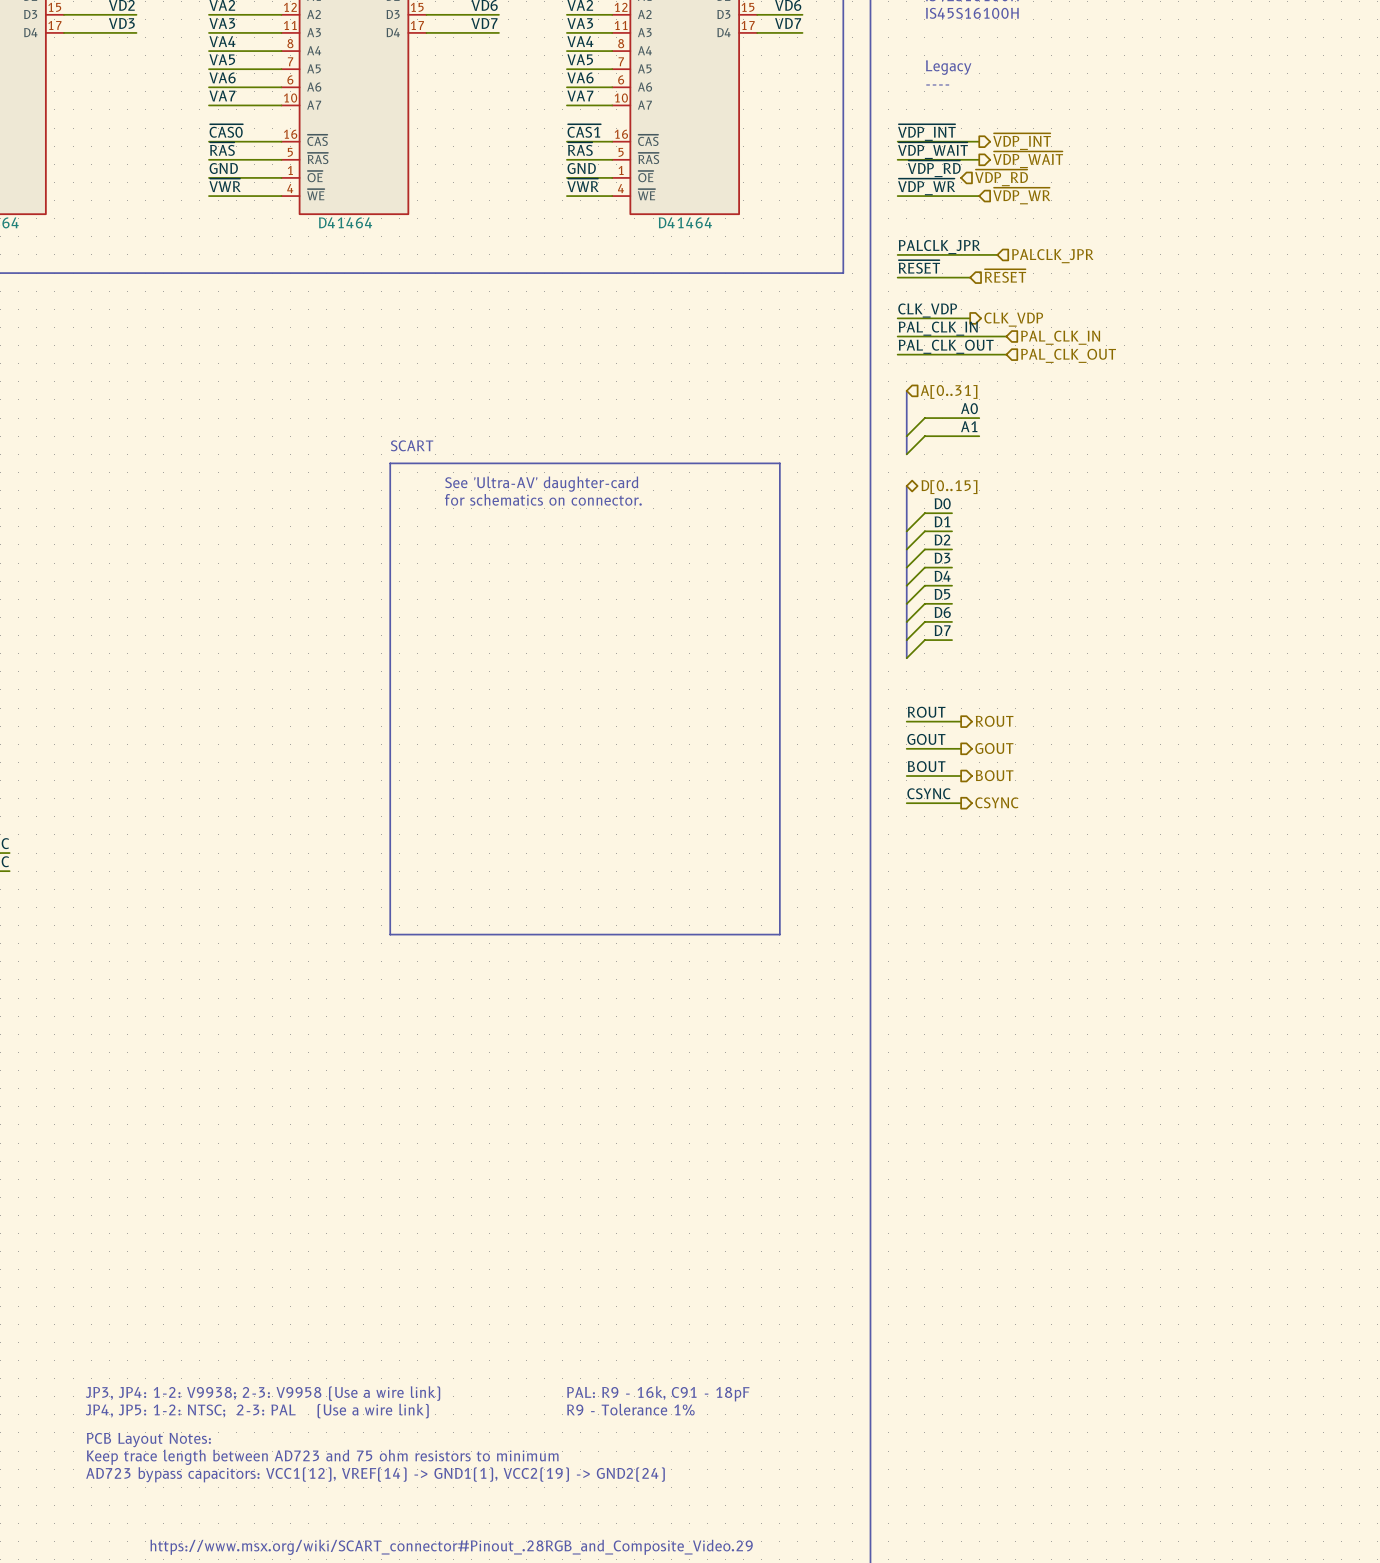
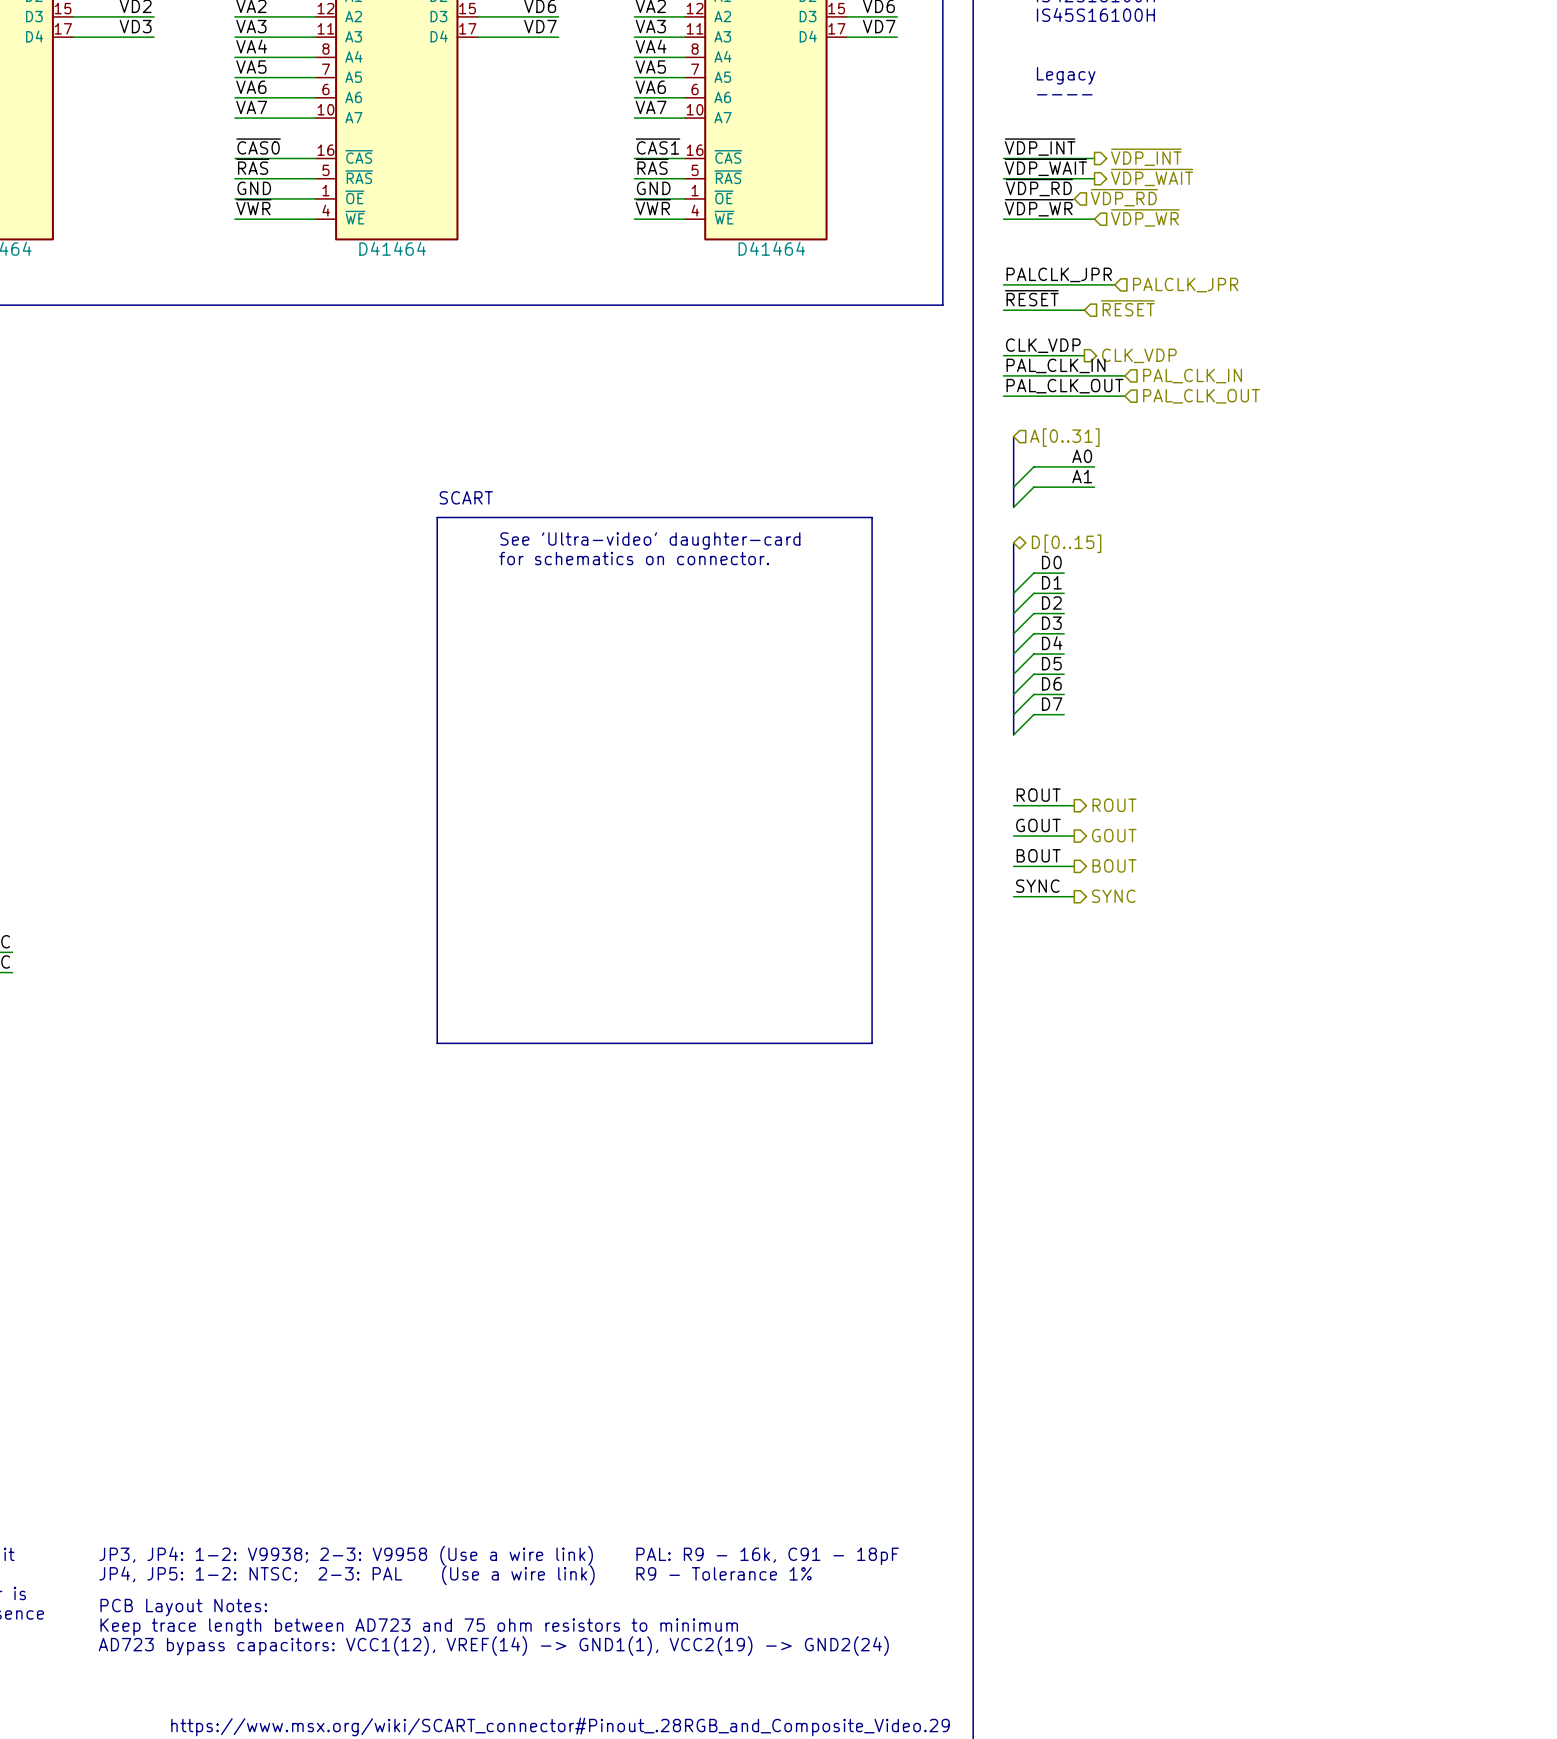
text: See 'Ultra-AV' daughter-card (541, 484) -> See 'Ultra-video' daughter-card (650, 541)
label: CSYNC (928, 793) -> SYNC (1037, 886)
hierarchical label: CSYNC (996, 802) -> SYNC (1113, 896)

